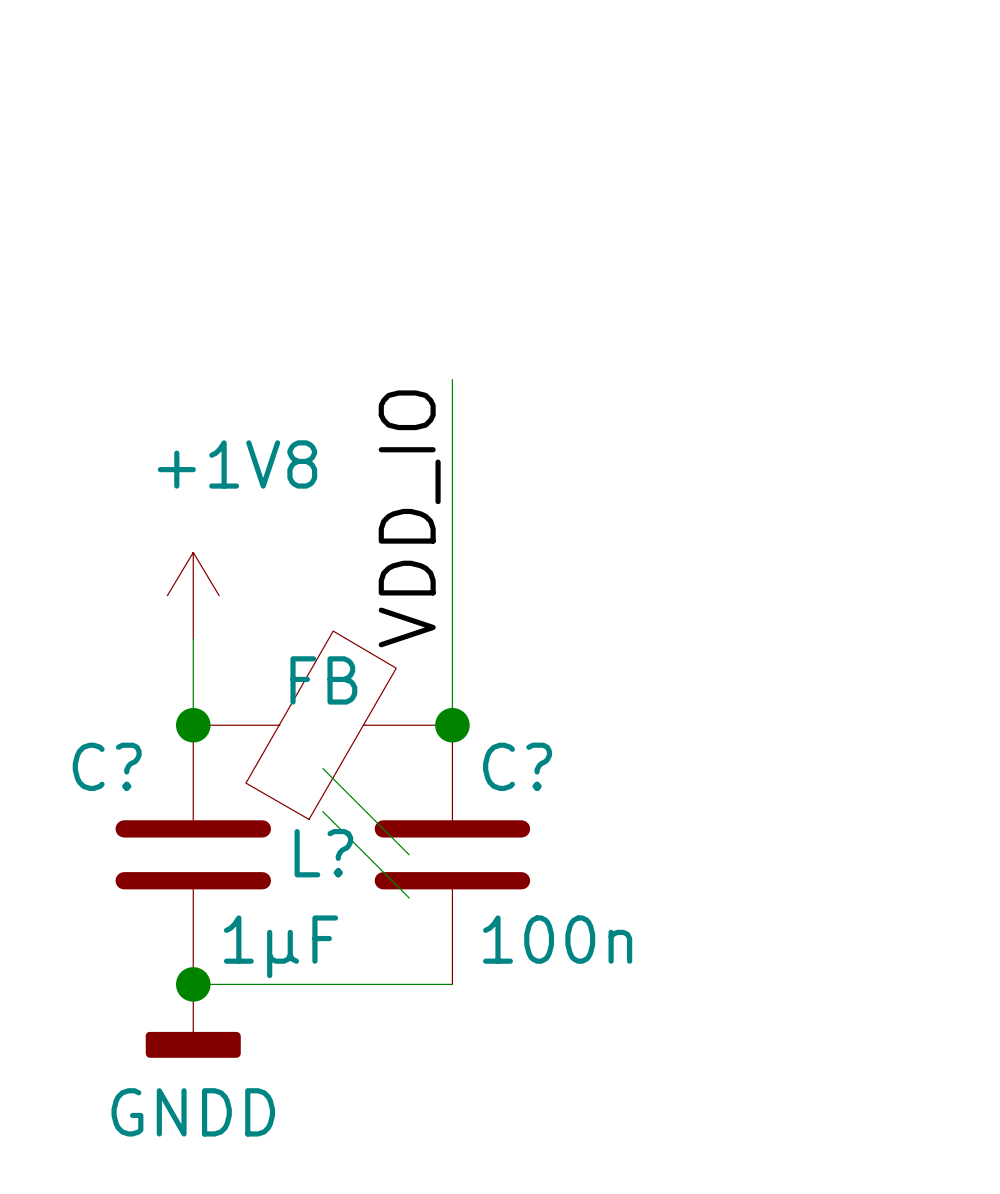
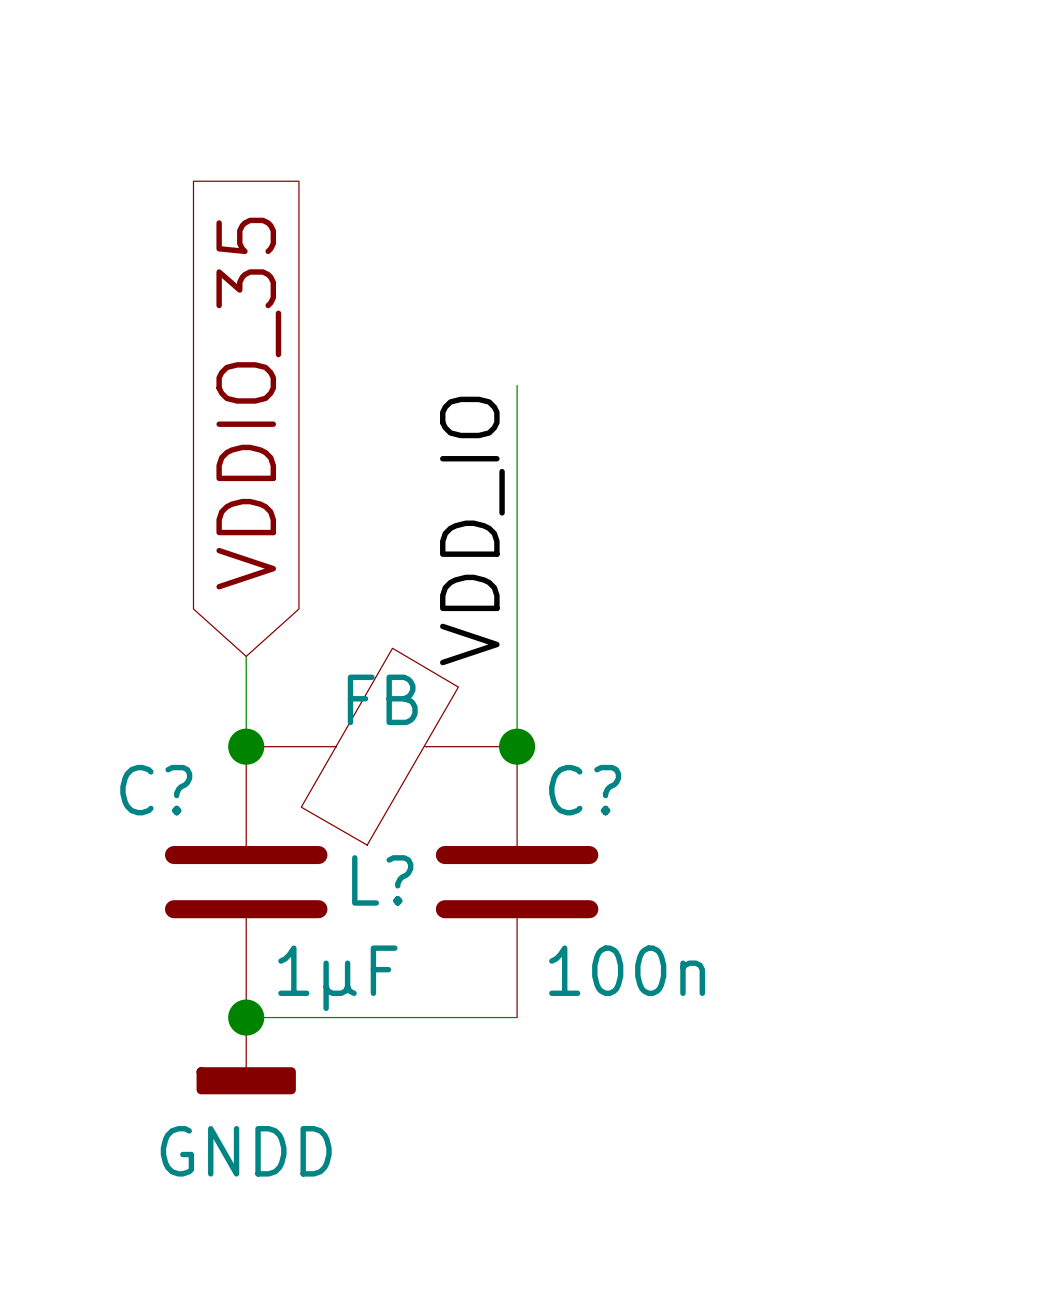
global label: none -> VDDIO_35 (248, 403)
power symbol: +1V8 (193, 595) -> none
wire: (322, 768) (409, 854) -> none
wire: (322, 811) (409, 898) -> none

